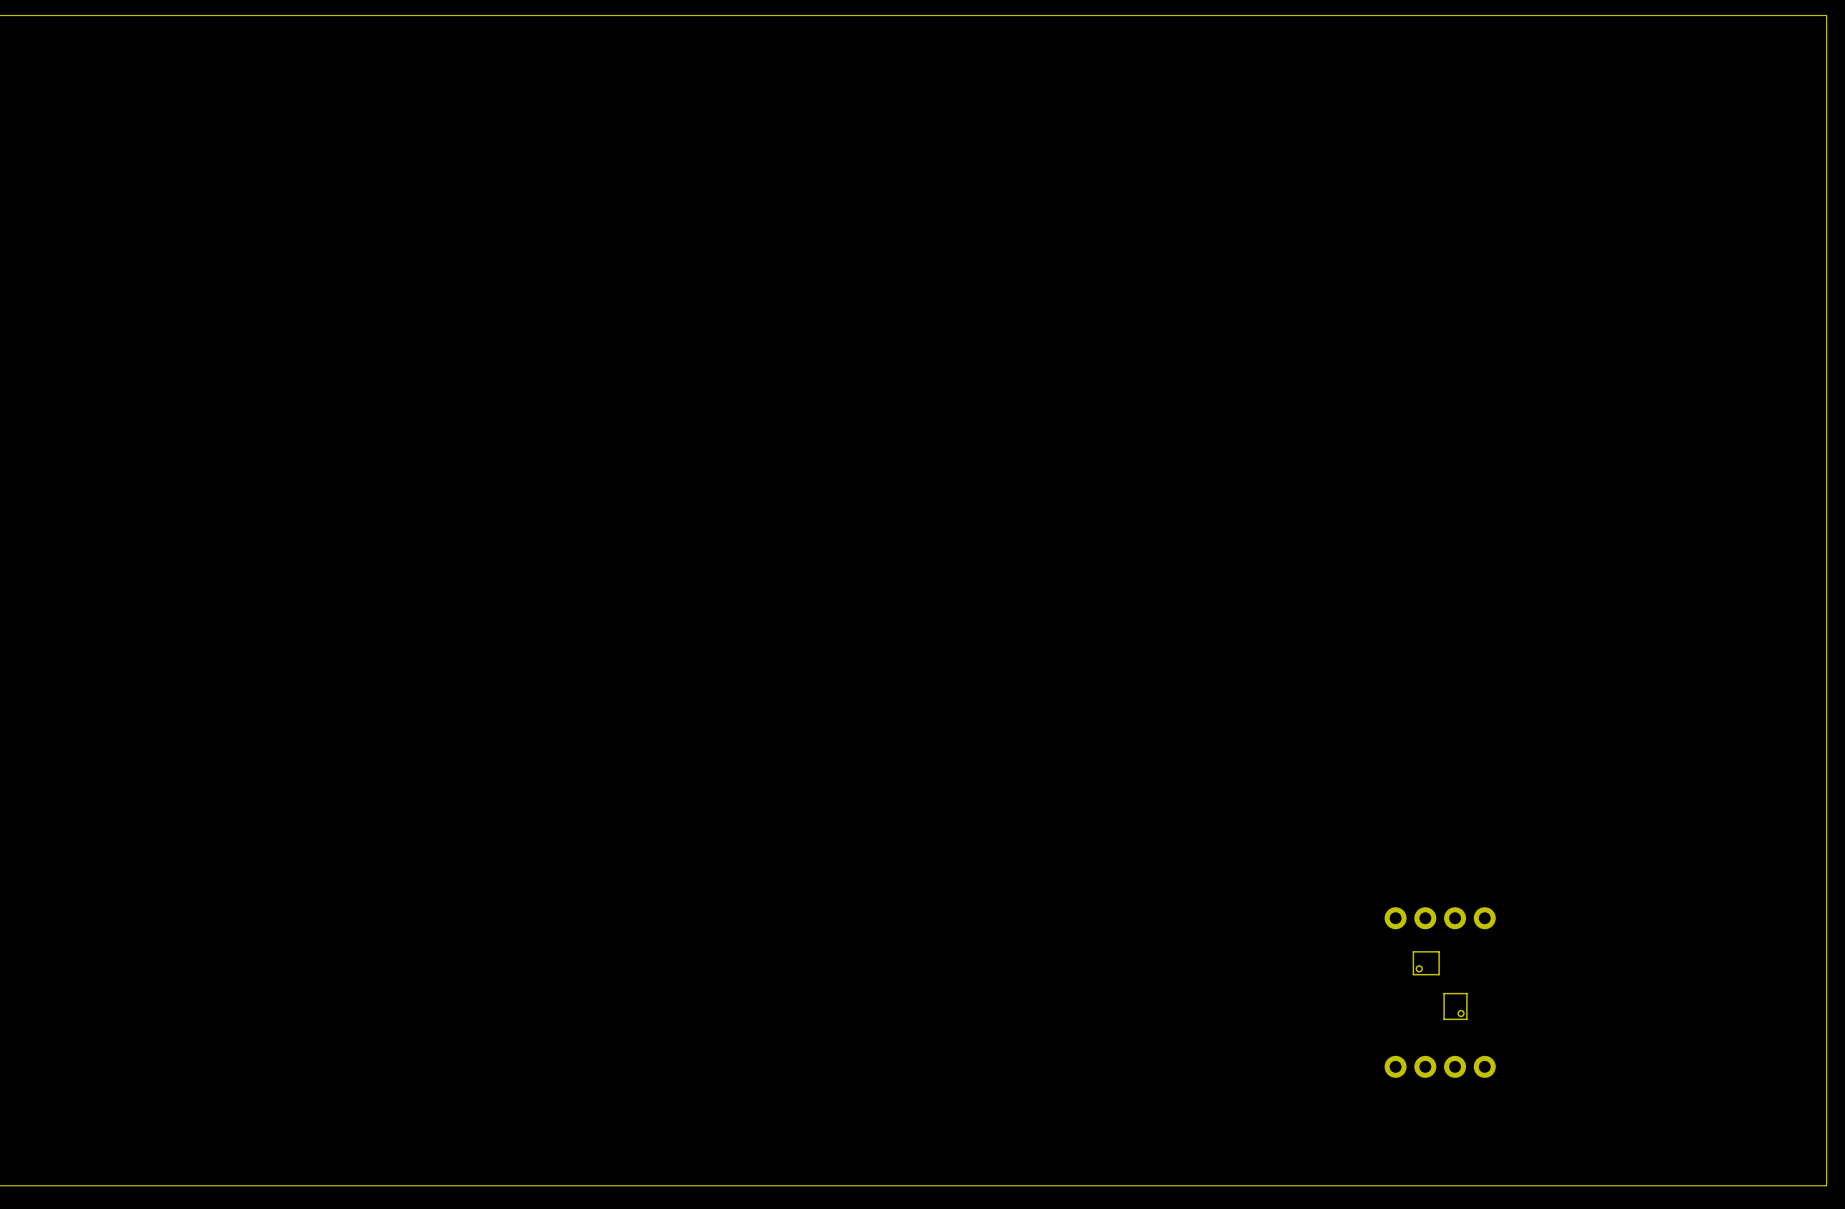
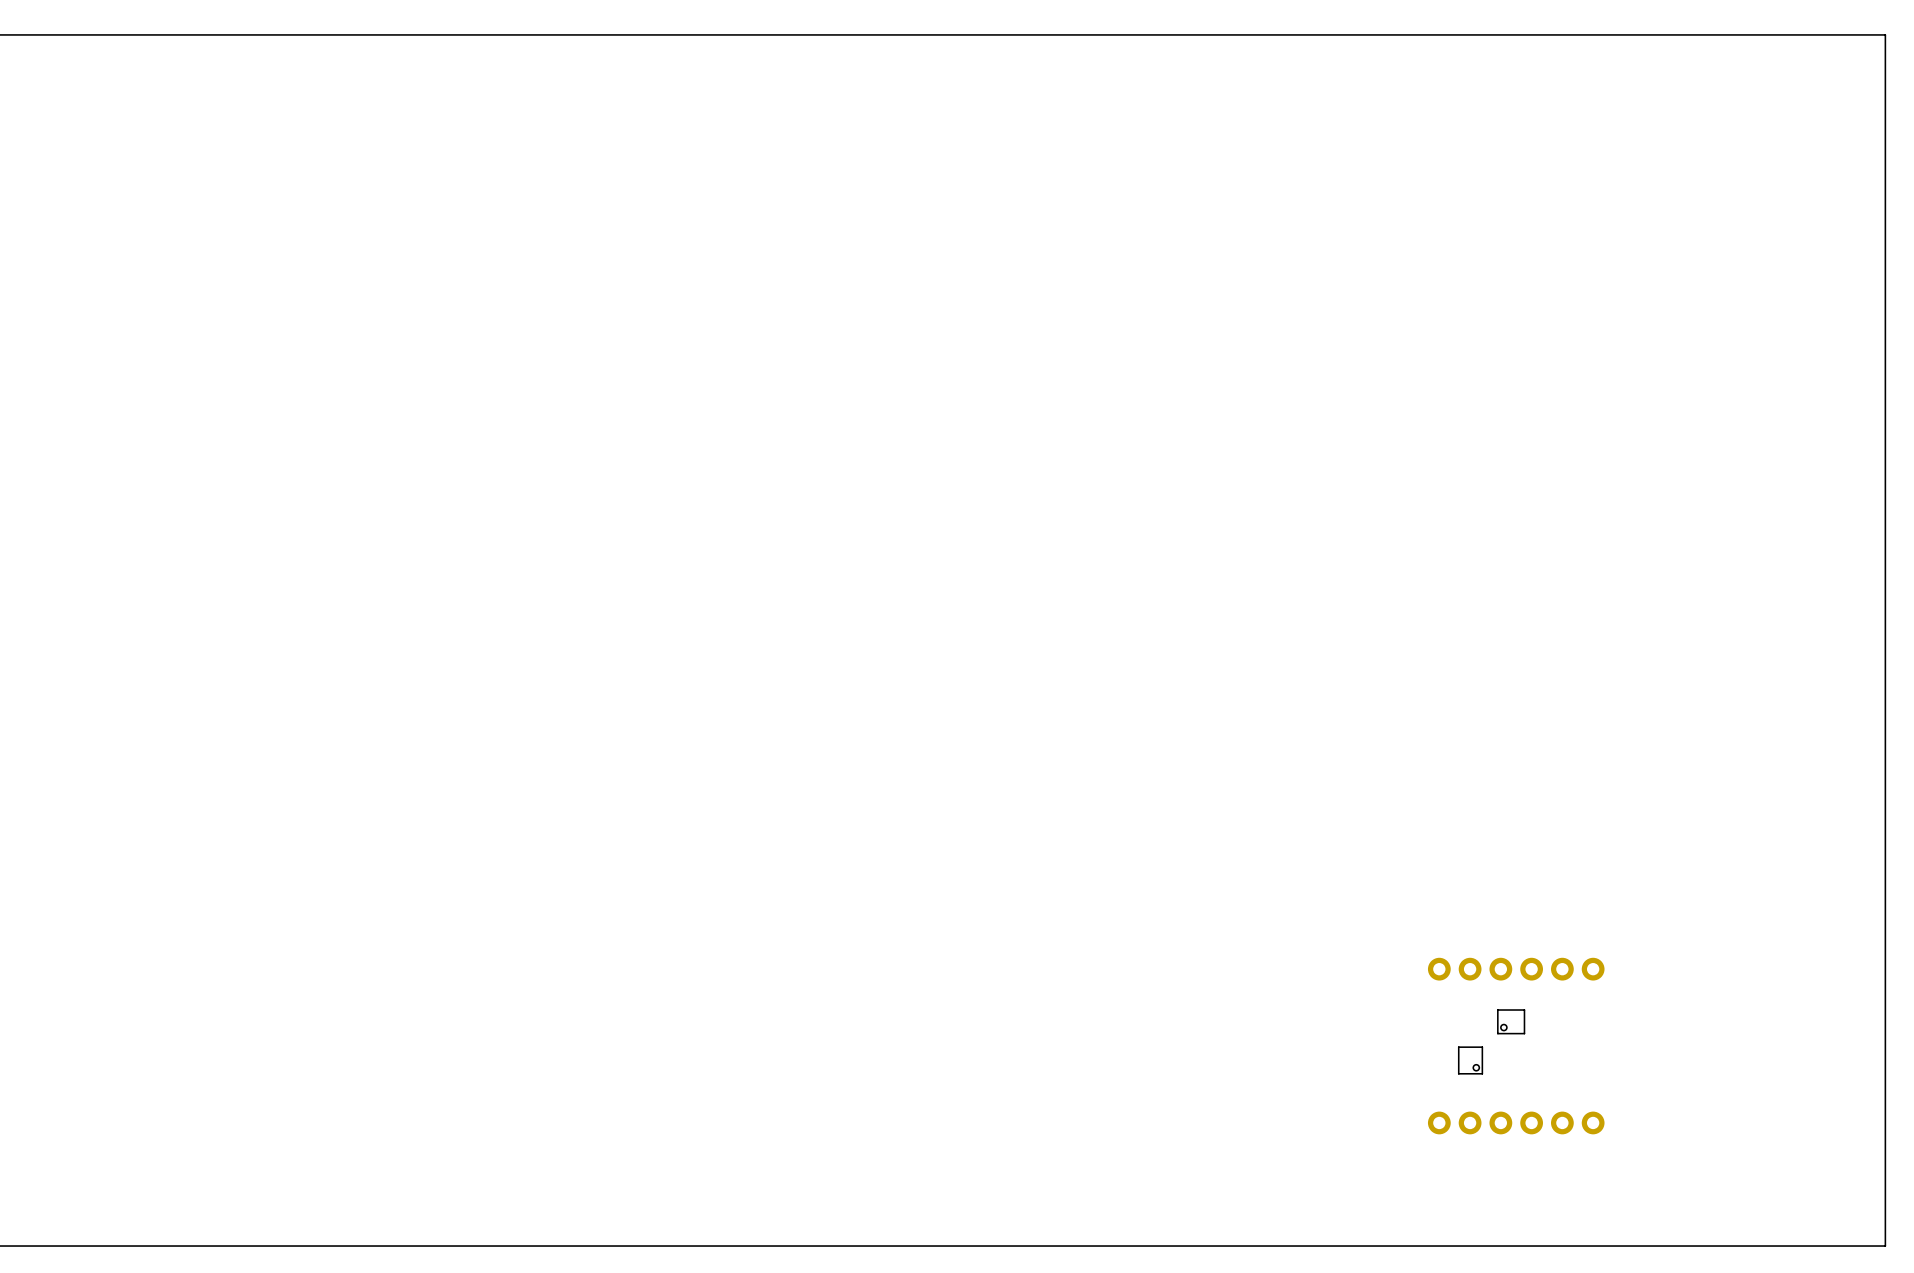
part: none -> (1577, 969)
part: (1426, 963) -> none
part: none -> (1511, 1021)
part: none -> (1470, 1060)
part: (1455, 1006) -> none
part: none -> (1577, 1122)

